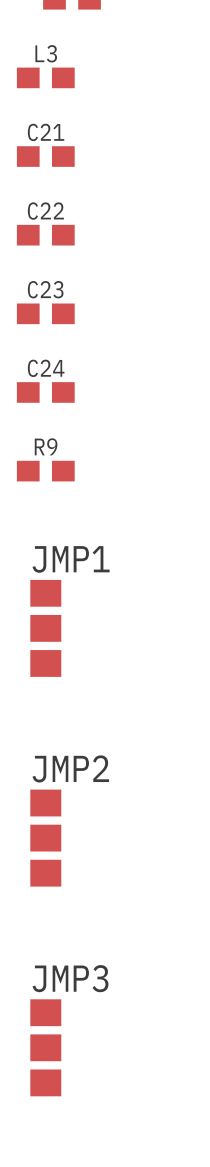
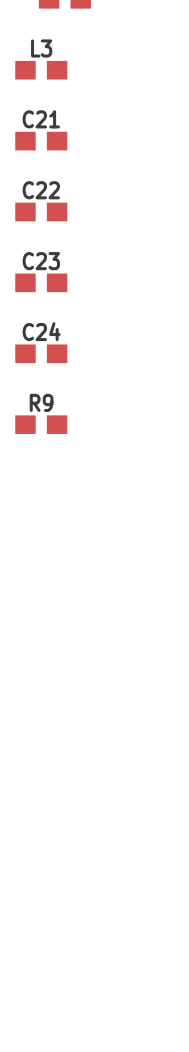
JMP1: (45, 628) -> none
JMP2: (45, 838) -> none
JMP3: (45, 1047) -> none

